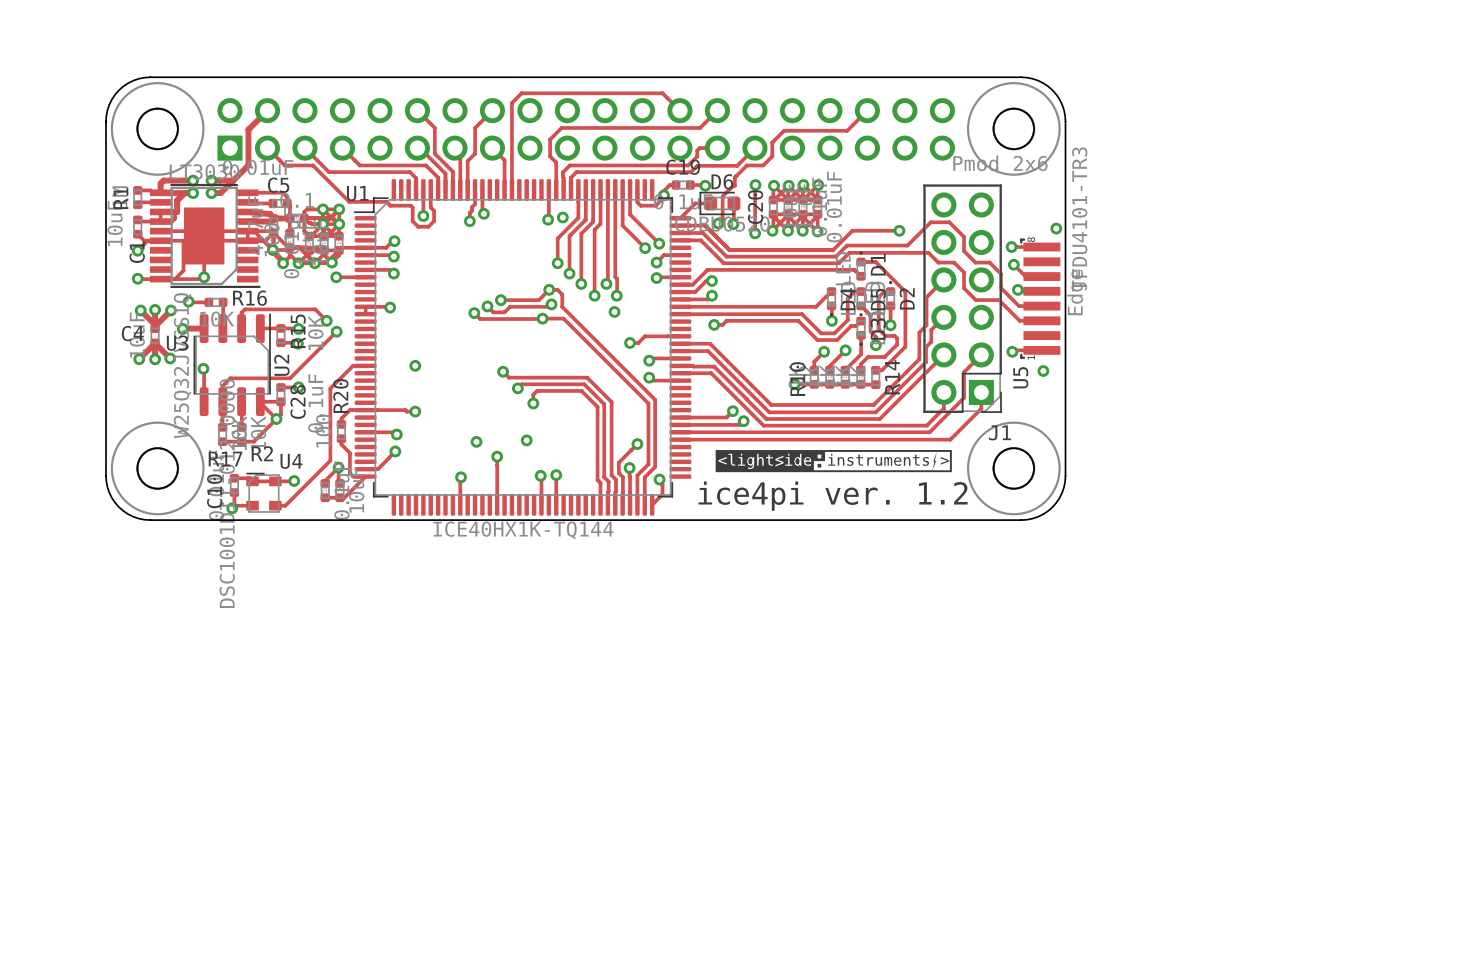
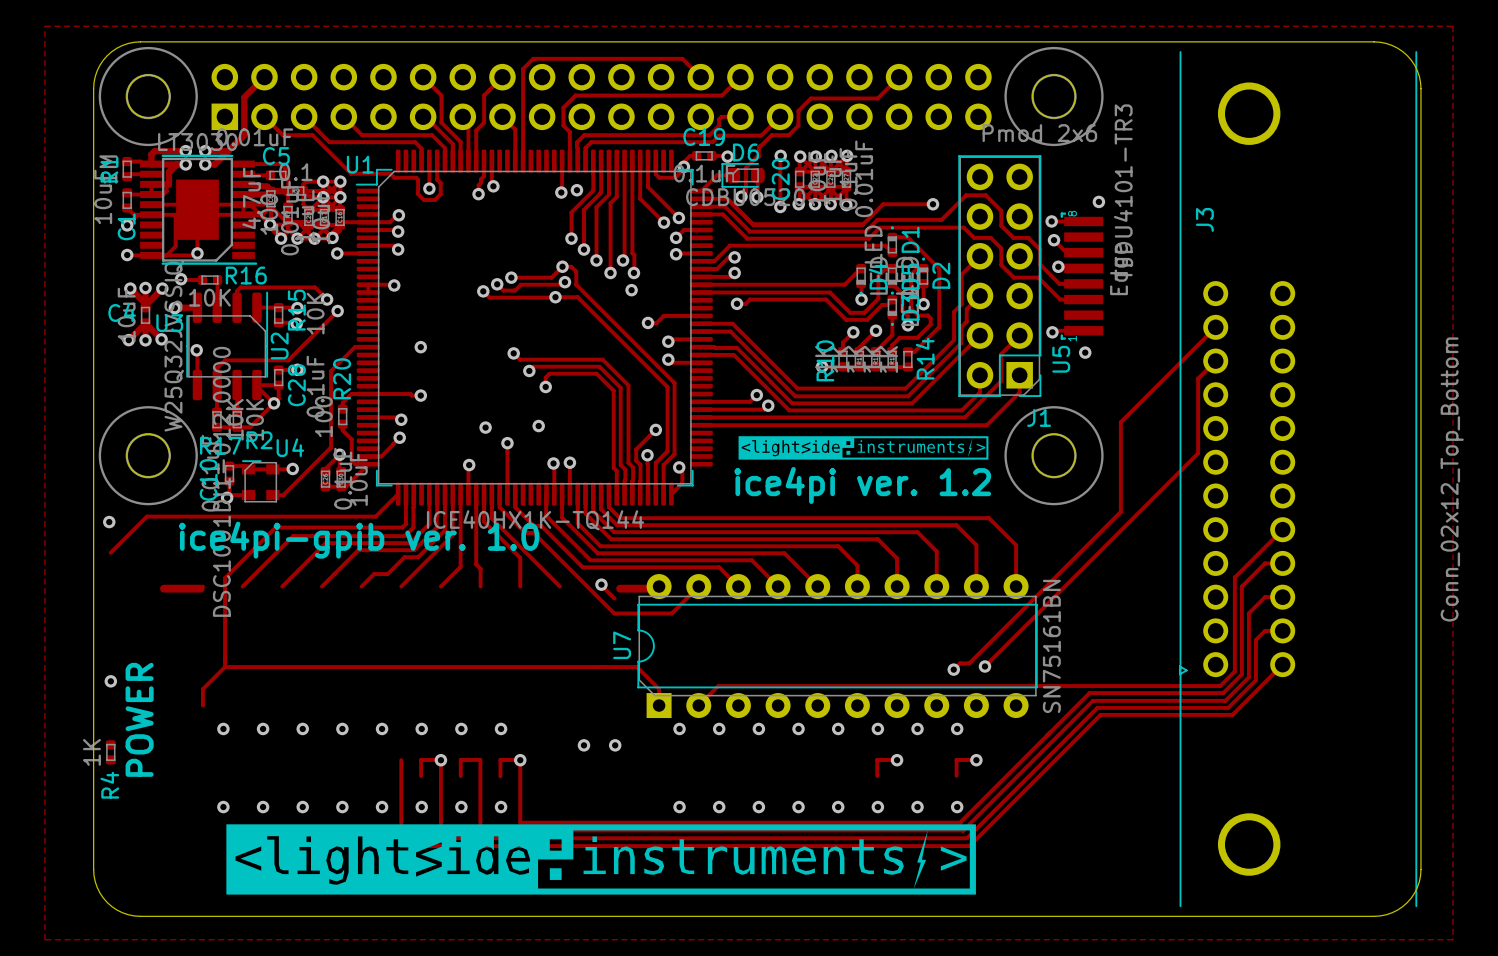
zone outline: none -> (44, 26) (1452, 26) (1452, 939) (44, 939) (44, 26)
board edge: (1021, 77) (1038, 80) (1052, 90) (1062, 104) (1065, 121) (1065, 481) (1062, 492) (1056, 502) (1048, 510) (1038, 516) (1021, 520) (150, 520) (133, 516) (118, 507) (109, 492) (106, 475) -> (1061, 41) (1380, 42) (1392, 45) (1402, 51) (1411, 60) (1417, 70) (1420, 88) (1420, 869) (1417, 887) (1411, 898) (1402, 906) (1392, 912) (1374, 916) (140, 916) (122, 912) (107, 902) (99, 892) (95, 881) (93, 869) (93, 463)
track: none -> (1215, 327) (1120, 422) (1120, 511) (969, 663) (960, 663) (953, 669)
track: none -> (1215, 361) (1198, 378) (1198, 453) (984, 666)
J3: none -> Conn_02x12_Top_Bottom (1298, 479)
track: none -> (398, 494) (375, 516) (146, 516) (110, 552)
track: none -> (405, 494) (405, 524) (402, 527) (275, 527) (225, 578) (225, 667)
track: none -> (413, 494) (413, 527) (404, 536) (293, 536) (242, 586)
track: none -> (429, 494) (429, 524) (410, 543) (325, 543) (282, 586)
track: none -> (437, 494) (436, 527) (414, 550) (358, 550) (321, 586)
track: none -> (444, 494) (444, 530) (418, 557) (404, 557) (387, 574) (374, 574) (361, 586)
track: none -> (452, 494) (452, 535) (401, 586)
track: none -> (460, 494) (460, 566) (440, 586)
track: none -> (476, 494) (476, 564) (480, 568) (480, 586)
track: none -> (484, 494) (484, 521) (520, 557) (520, 586)
track: none -> (491, 494) (491, 518) (559, 586)
track: none -> (499, 494) (499, 507) (525, 532) (533, 532) (614, 613) (671, 613) (698, 586)
track: none -> (515, 494) (515, 507) (534, 525) (541, 525) (582, 567) (719, 567) (738, 586)
track: none -> (546, 494) (546, 515) (590, 560) (751, 560) (778, 586)
track: none -> (562, 494) (562, 517) (597, 553) (784, 553) (817, 586)
track: none -> (577, 494) (577, 523) (600, 546) (838, 546) (857, 565) (857, 586)
track: none -> (585, 494) (585, 513) (611, 539) (877, 539) (897, 558) (897, 586)
track: none -> (593, 494) (593, 511) (614, 532) (917, 532) (936, 551) (936, 586)
track: none -> (601, 494) (601, 509) (616, 525) (956, 525) (976, 545) (976, 586)
track: none -> (608, 494) (608, 507) (619, 518) (989, 518) (1016, 545) (1016, 586)
via: none -> (109, 522)
track: none -> (1282, 529) (1234, 577) (1234, 671) (1220, 686) (718, 686) (698, 705)
text: none -> ice4pi-gpib ver. 1.0 (359, 540)
track: none -> (1282, 563) (1265, 563) (1241, 586) (1241, 674) (1223, 693) (1089, 693) (961, 821)
track: none -> (601, 584) (614, 598)
via: none -> (601, 584)
track: none -> (202, 586) (200, 588) (163, 588)
track: none -> (659, 586) (656, 588) (620, 588)
track: none -> (1282, 597) (1265, 597) (1248, 613) (1248, 677) (1225, 700) (1092, 700) (963, 830)
track: none -> (1282, 630) (1265, 630) (1255, 640) (1255, 680) (1228, 707) (1097, 707) (966, 838) (440, 838) (440, 760)
U7: none -> SN75161BN (837, 646)
track: none -> (1282, 664) (1232, 714) (1100, 714) (969, 845)
via: none -> (984, 666)
track: none -> (225, 667) (202, 689) (202, 705)
track: none -> (225, 667) (636, 667) (659, 689) (659, 705)
via: none -> (953, 669)
via: none -> (110, 681)
text: none -> POWER (139, 719)
via: none -> (223, 728)
via: none -> (263, 728)
via: none -> (302, 728)
via: none -> (342, 728)
via: none -> (382, 728)
via: none -> (421, 728)
via: none -> (461, 728)
via: none -> (501, 728)
via: none -> (679, 728)
via: none -> (719, 728)
via: none -> (758, 728)
via: none -> (798, 728)
via: none -> (838, 728)
via: none -> (877, 728)
via: none -> (917, 728)
via: none -> (957, 728)
via: none -> (583, 745)
via: none -> (615, 745)
R4: none -> 1K (110, 752)
track: none -> (401, 760) (401, 846) (969, 846)
track: none -> (440, 759) (421, 759) (421, 776)
via: none -> (440, 760)
track: none -> (520, 759) (500, 759) (500, 776)
track: none -> (520, 760) (520, 822) (961, 822)
via: none -> (520, 760)
track: none -> (896, 759) (877, 759) (877, 776)
via: none -> (897, 760)
track: none -> (976, 759) (956, 759) (956, 775)
via: none -> (976, 760)
track: none -> (460, 776) (460, 759) (480, 759) (480, 830) (964, 830)
via: none -> (223, 807)
via: none -> (263, 807)
via: none -> (302, 807)
via: none -> (342, 807)
via: none -> (382, 807)
via: none -> (421, 807)
via: none -> (461, 807)
via: none -> (501, 807)
via: none -> (679, 807)
via: none -> (719, 807)
via: none -> (758, 807)
via: none -> (798, 807)
via: none -> (838, 807)
via: none -> (877, 807)
via: none -> (917, 807)
via: none -> (957, 807)
drawing: none -> [226, 824, 976, 895]

